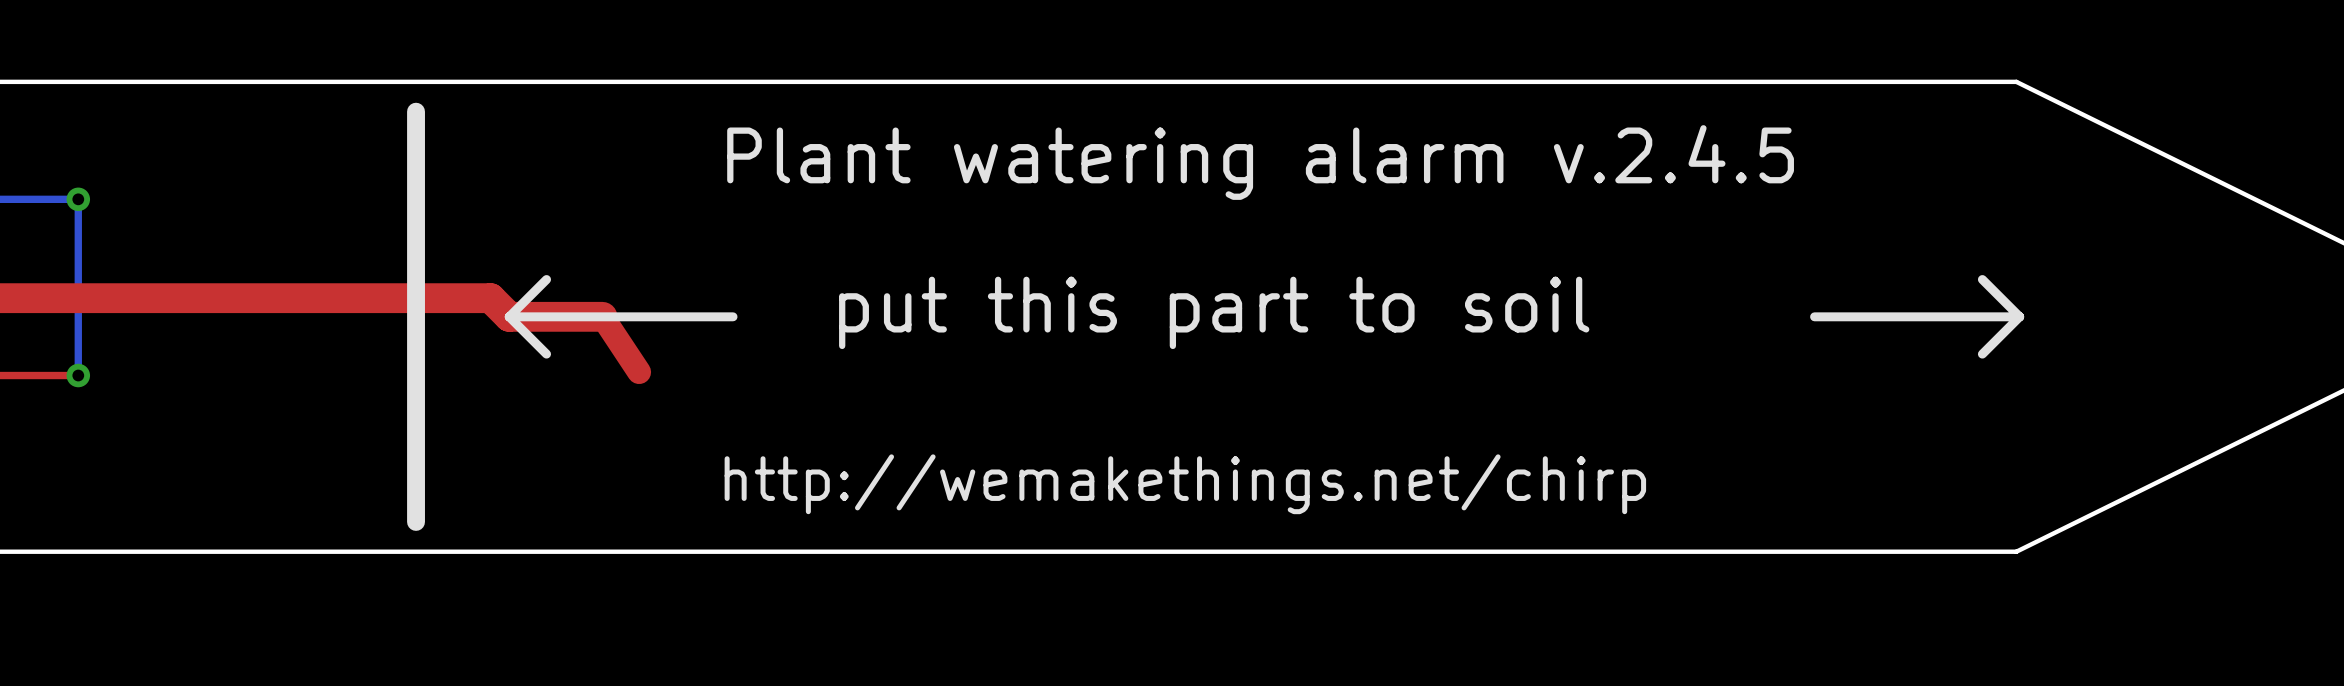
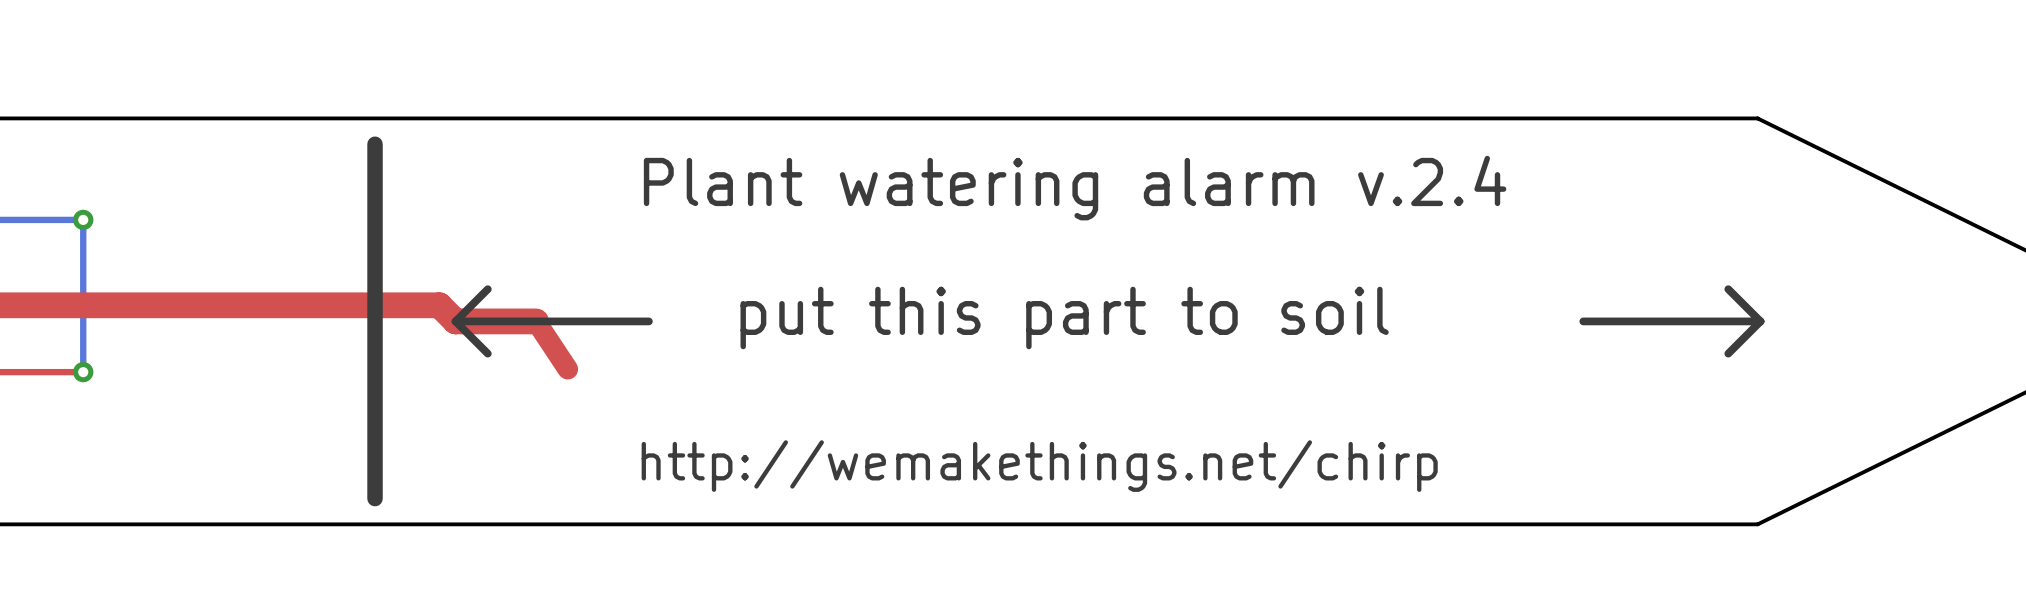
text: Plant watering alarm v.2.4.5 (1260, 162) -> Plant watering alarm v.2.4 (1075, 188)

